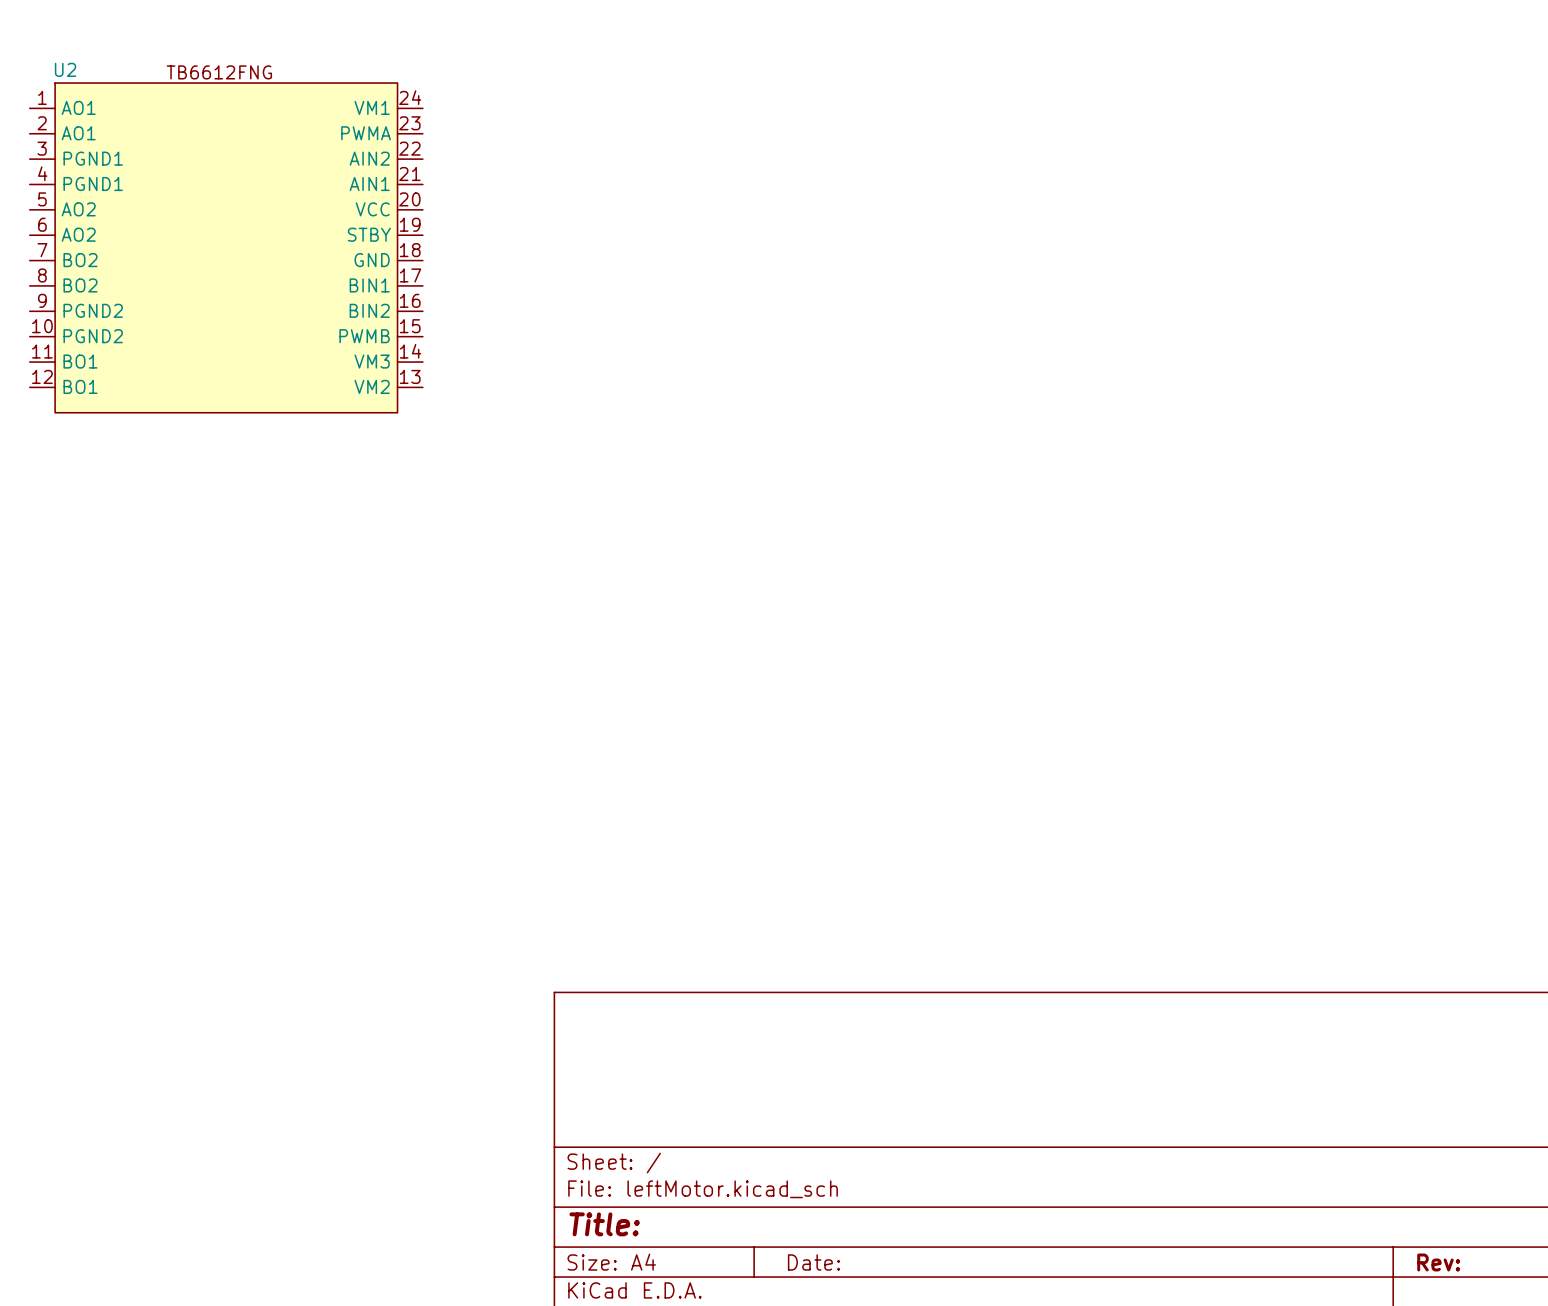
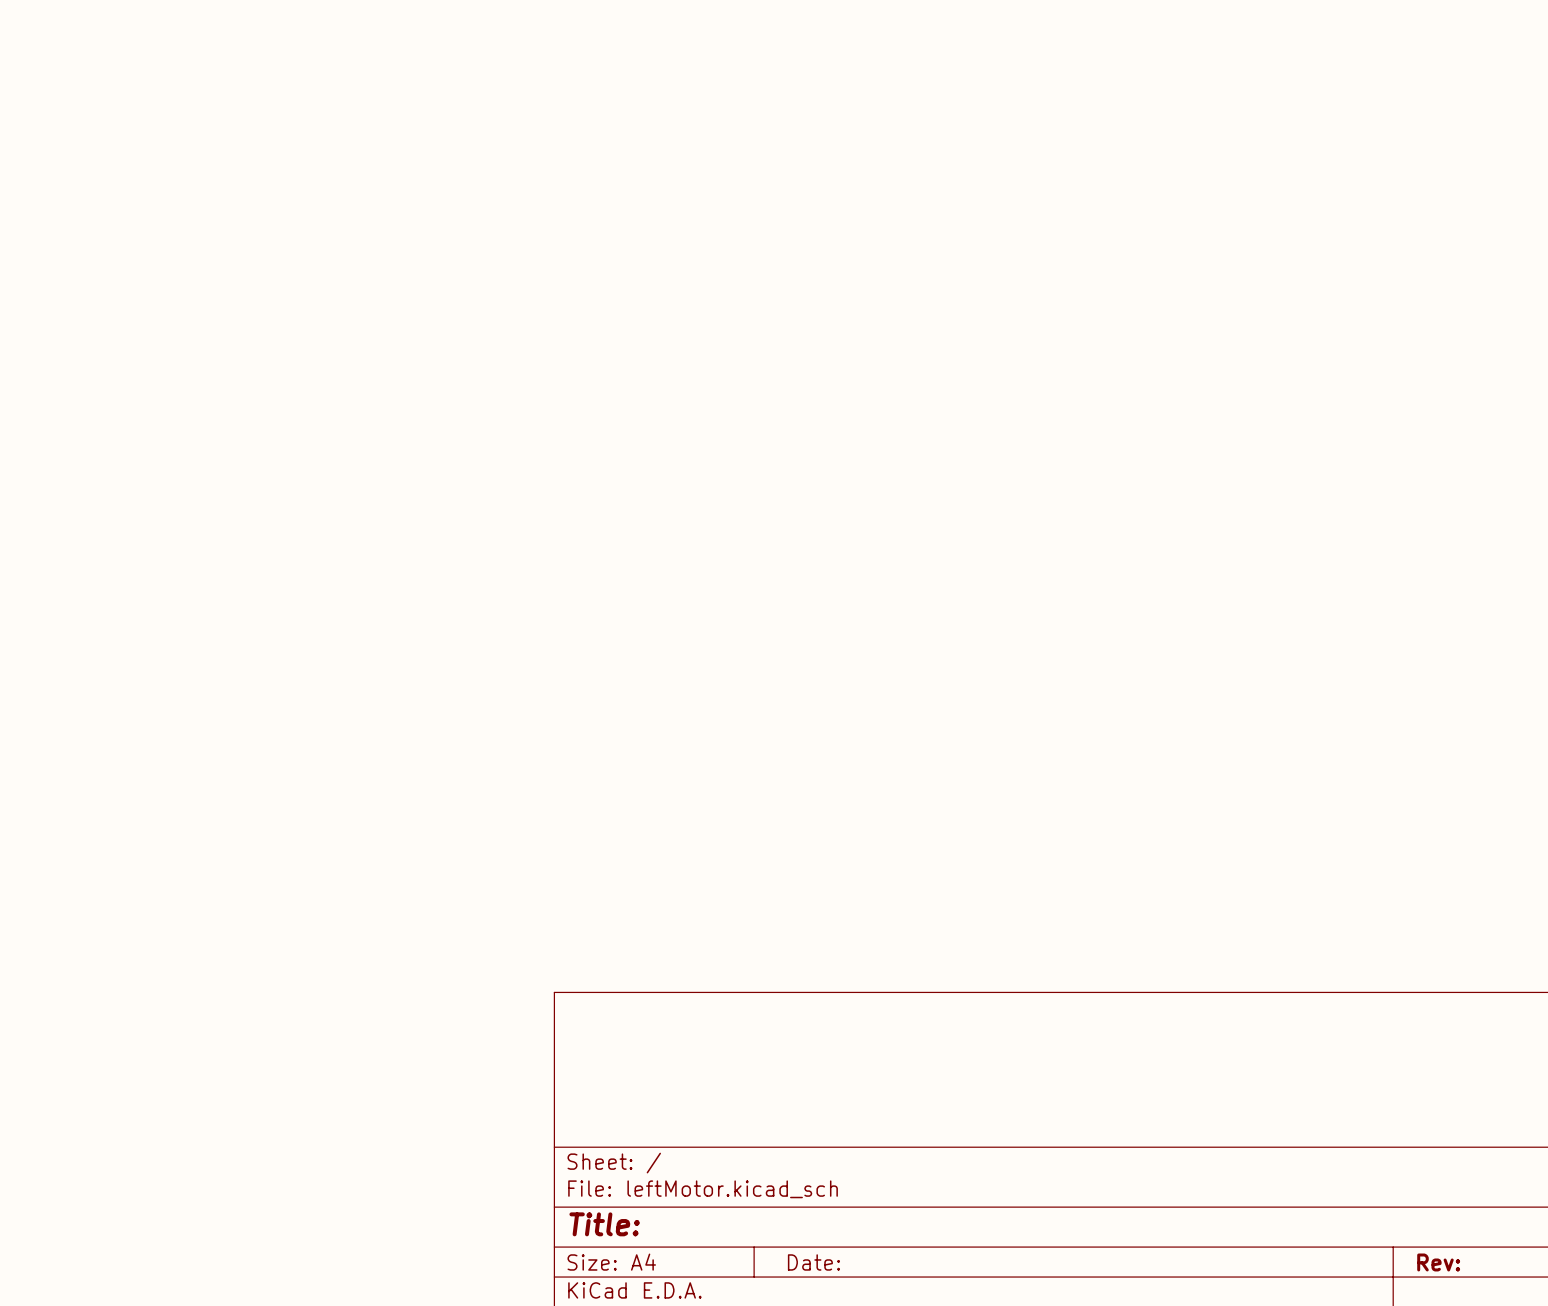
U2: (226, 247) -> none

